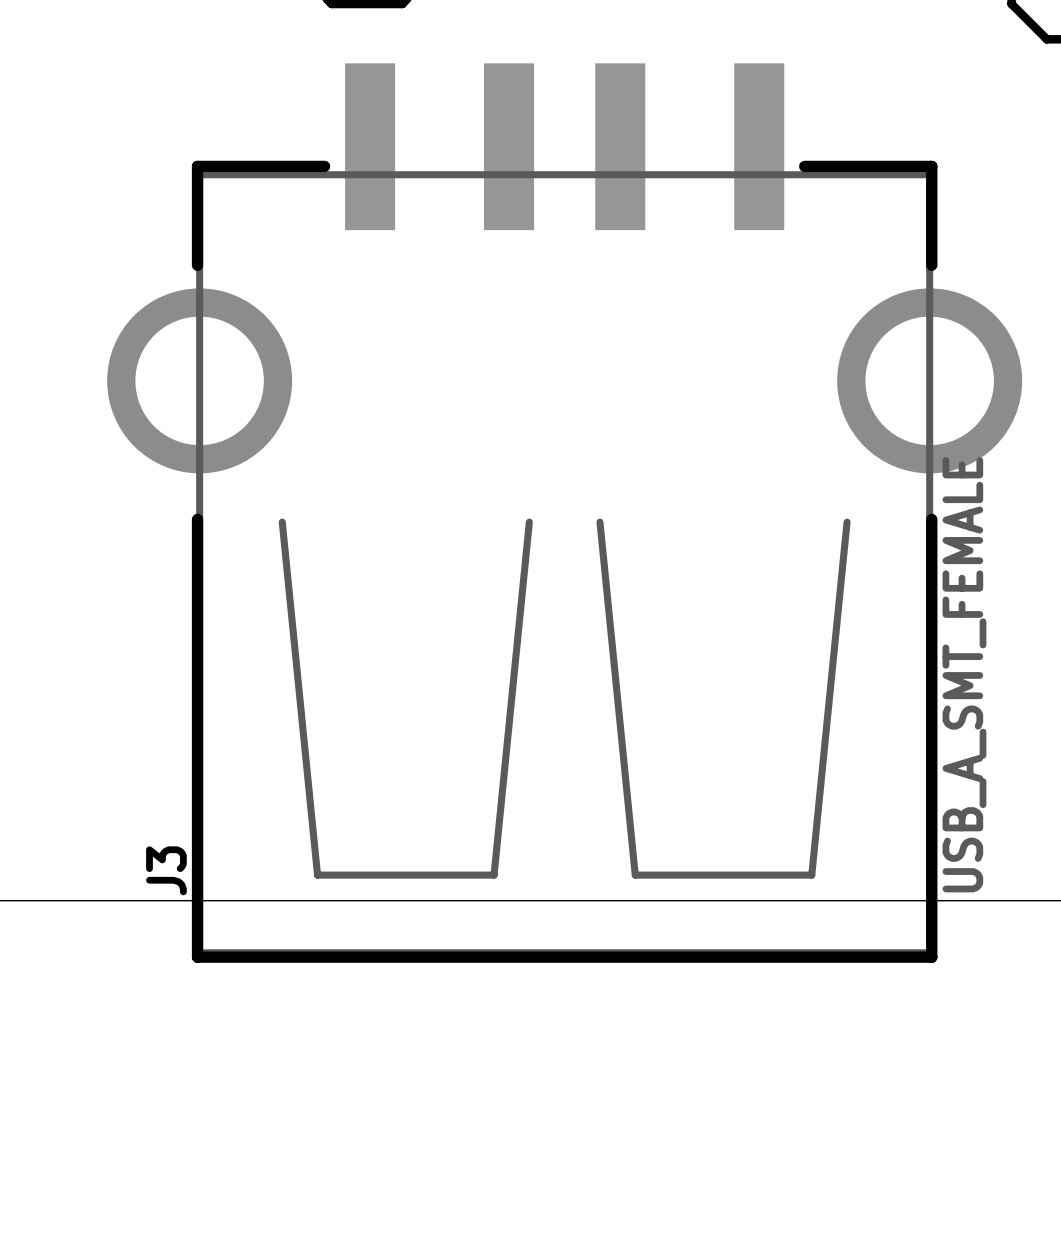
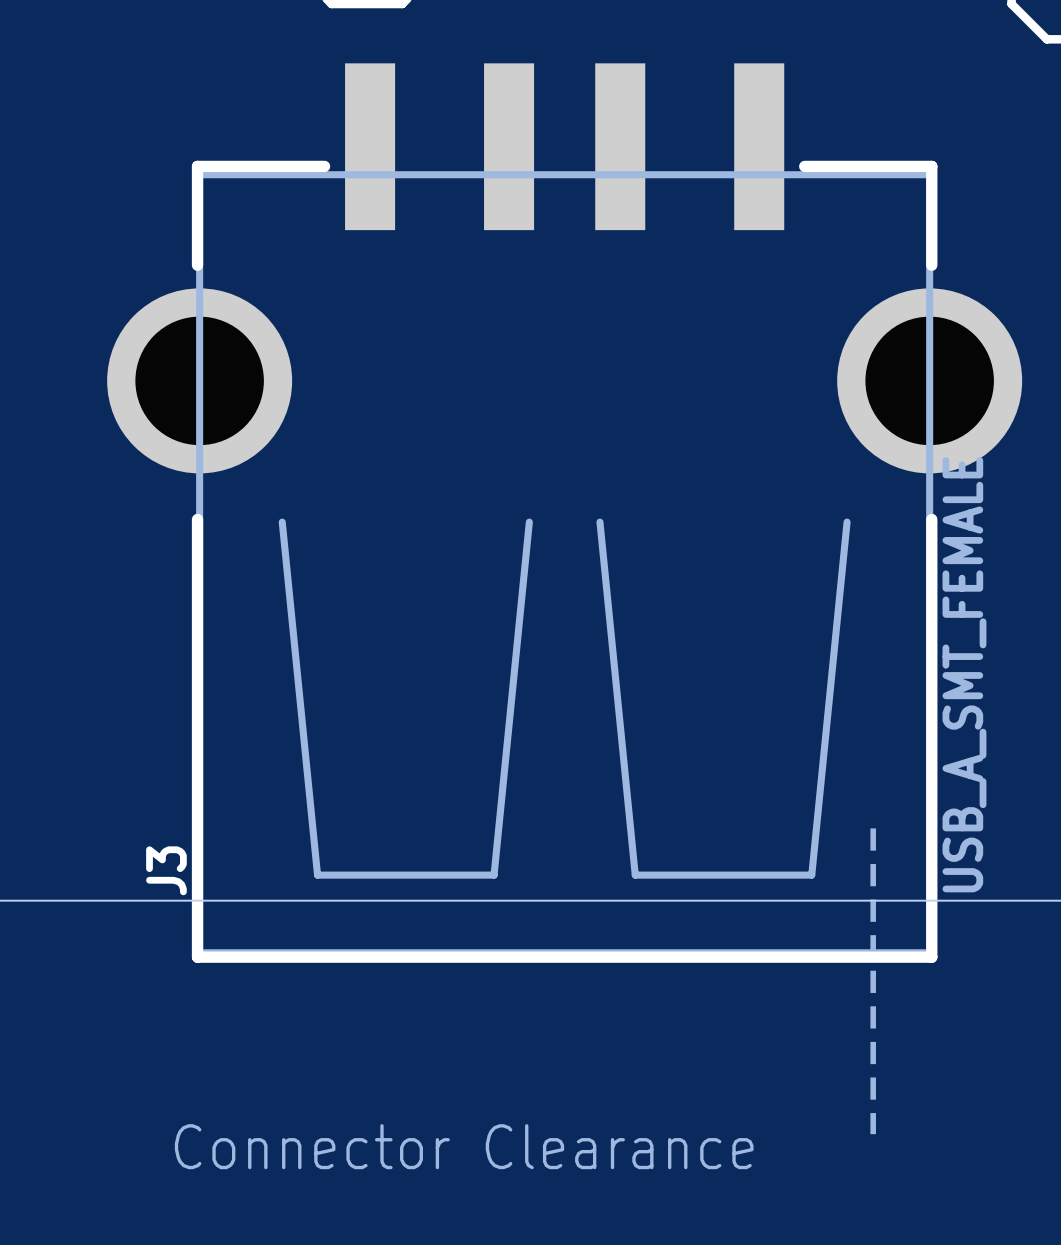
line: none -> (873, 828) (873, 1134)
text: none -> Connector Clearance (464, 1146)

